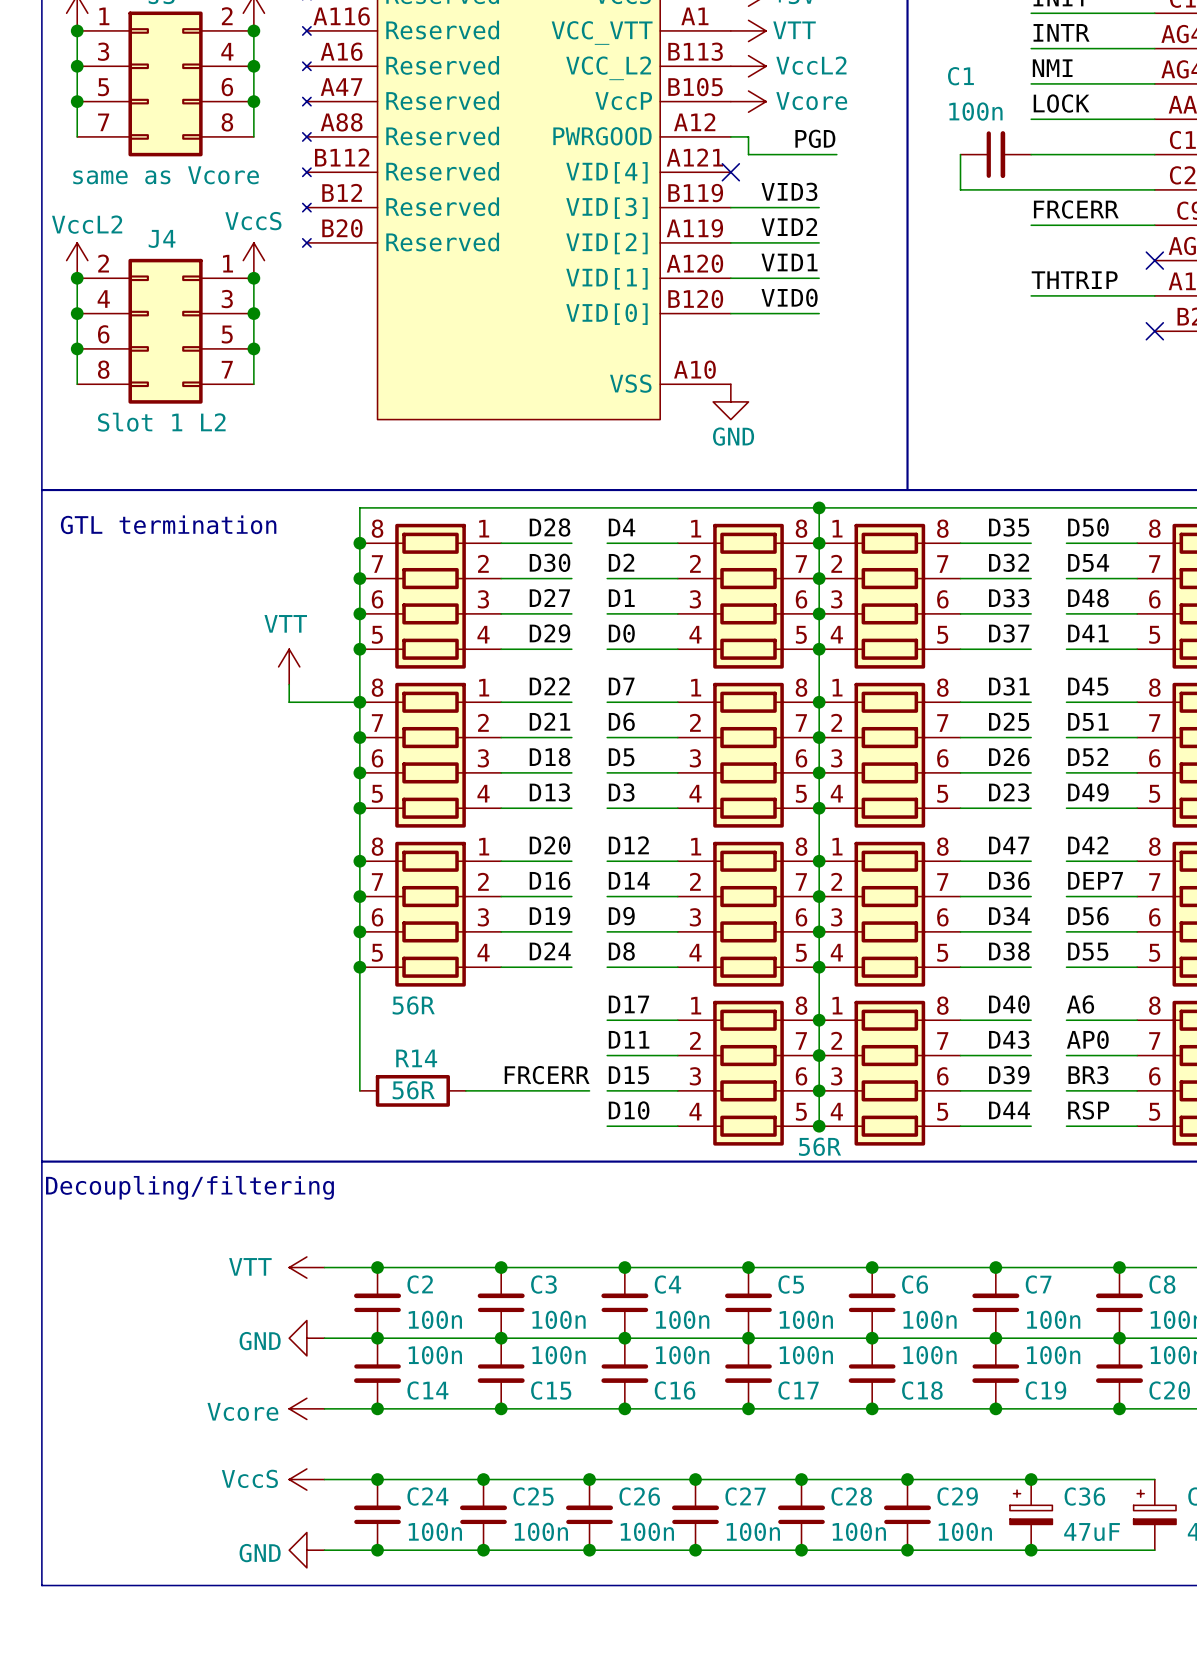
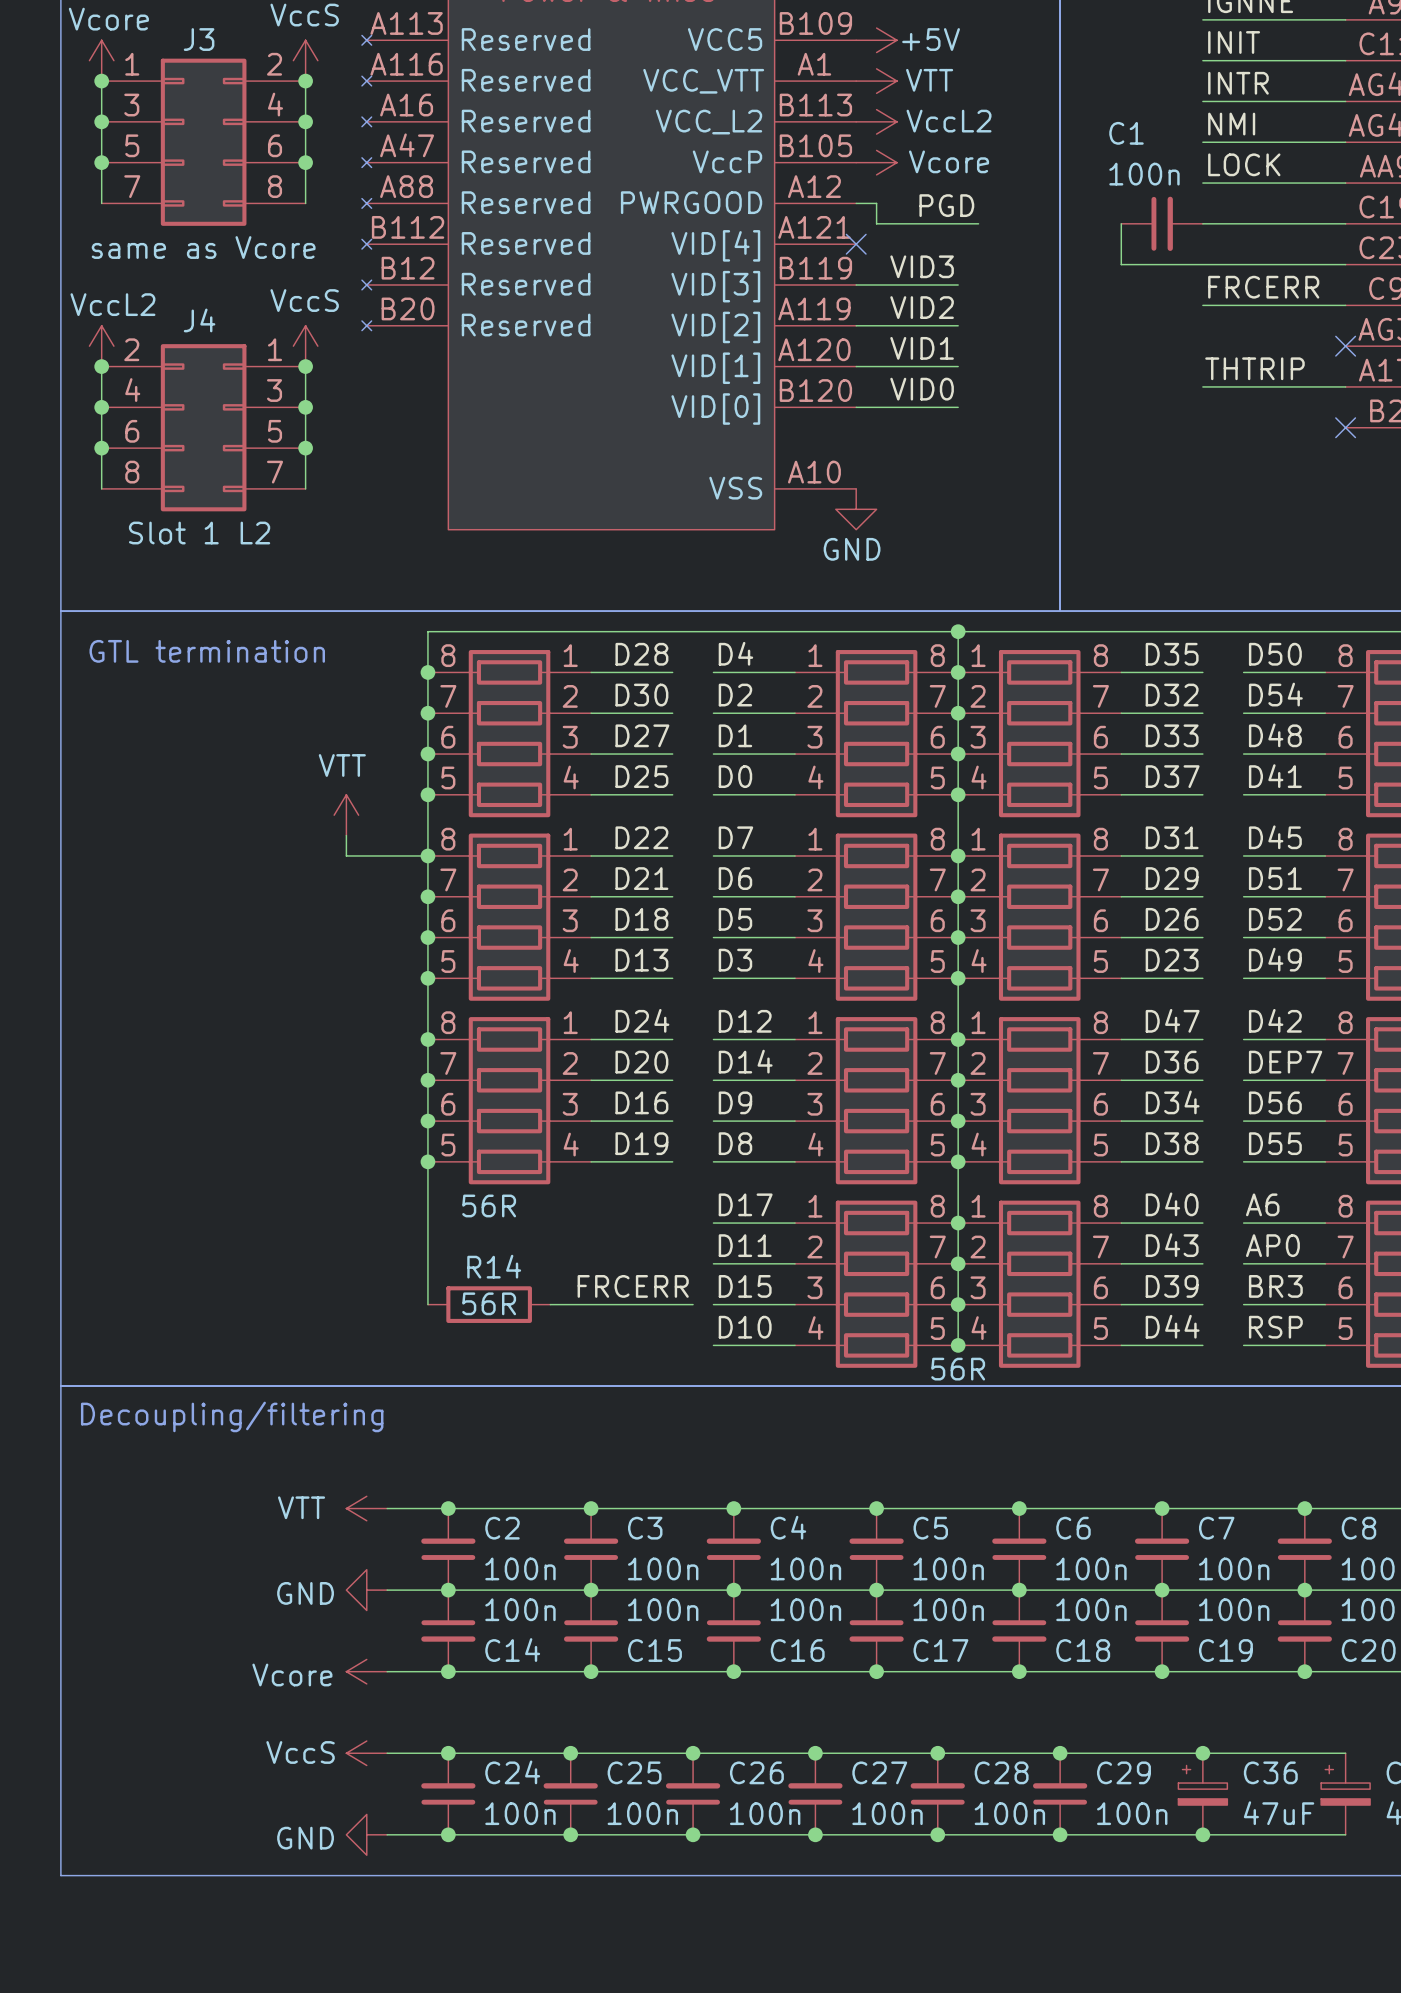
label: D29 (549, 633) -> D25 (641, 776)
label: D25 (1009, 721) -> D29 (1172, 878)
label: D20 (550, 845) -> D24 (642, 1020)
label: D16 (550, 880) -> D20 (641, 1062)
label: D19 (549, 916) -> D16 (641, 1102)
label: D24 (550, 951) -> D19 (641, 1143)

